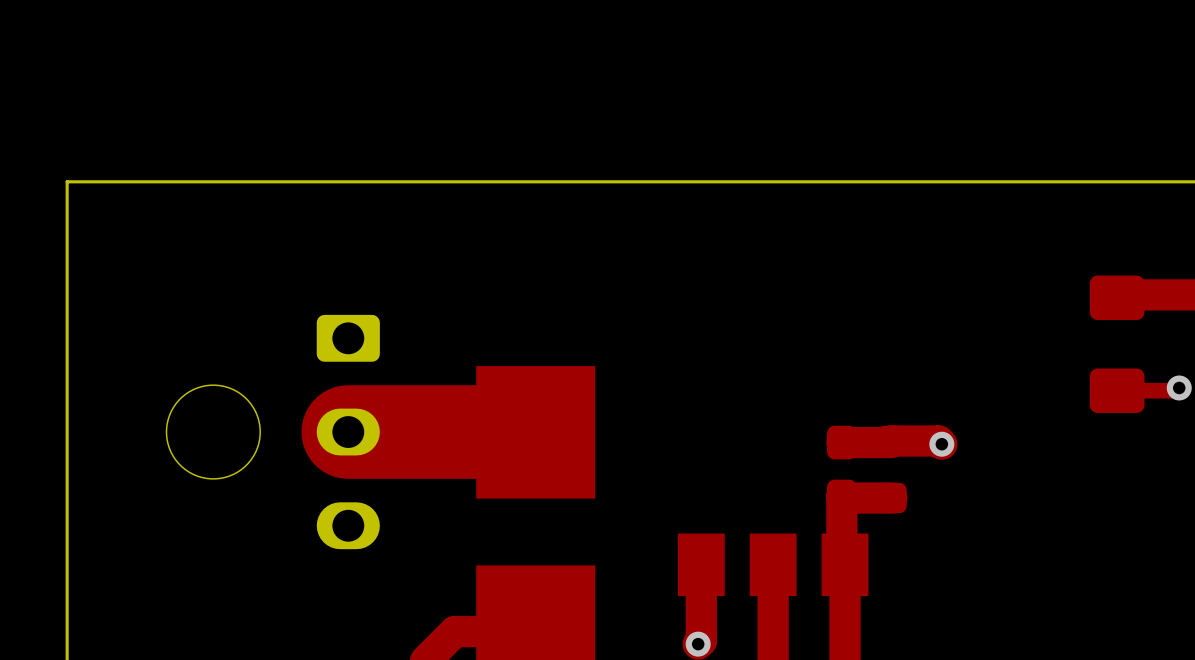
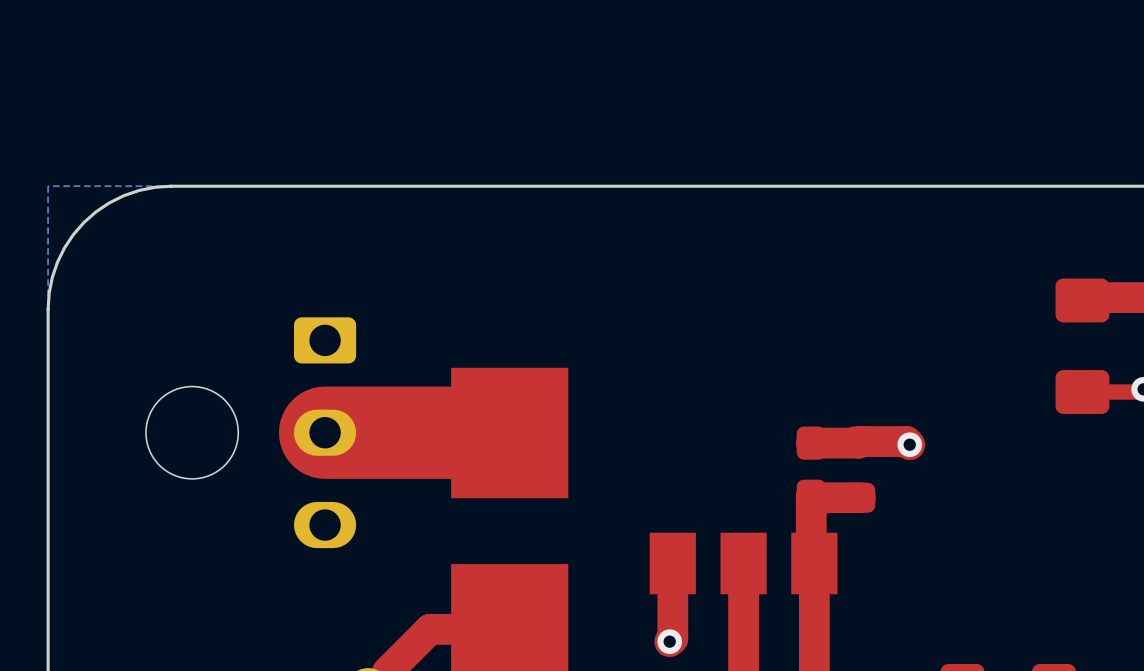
board edge: (192, 181) (67, 181) (67, 306) -> (171, 186) (155, 187) (124, 195) (109, 202) (84, 222) (64, 247) (57, 262) (52, 277) (48, 309)

